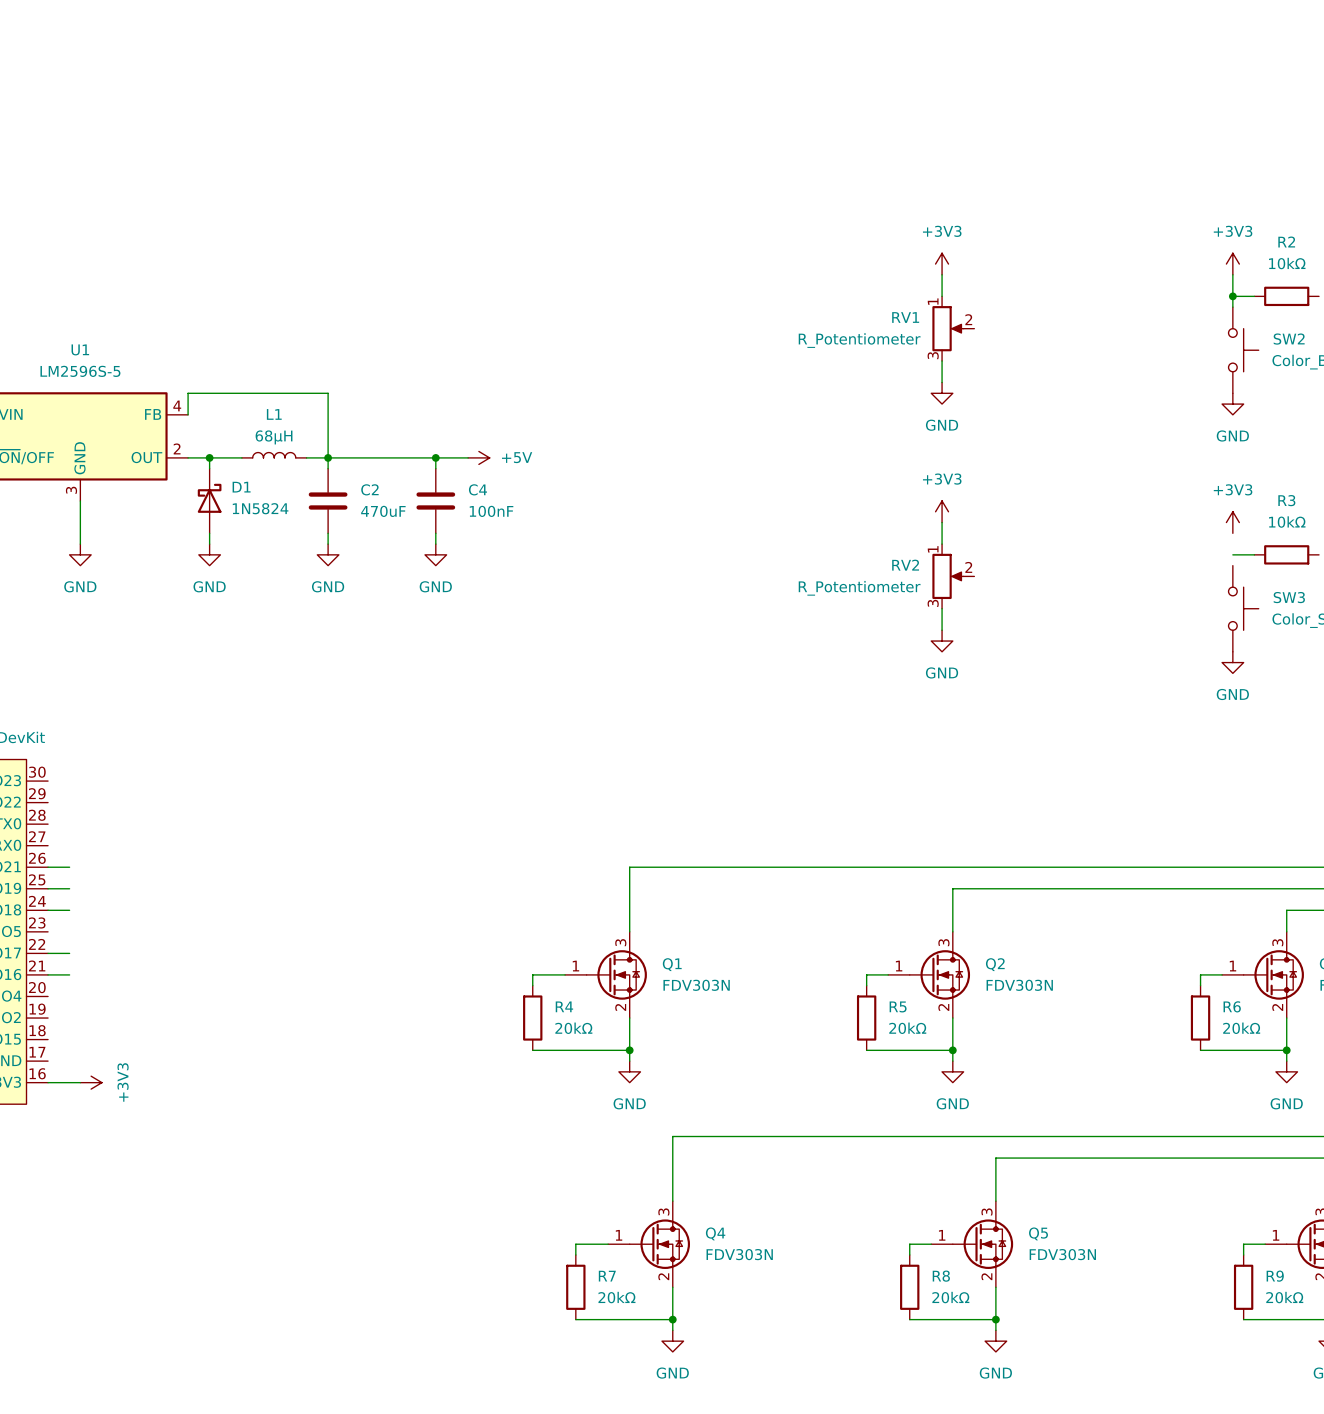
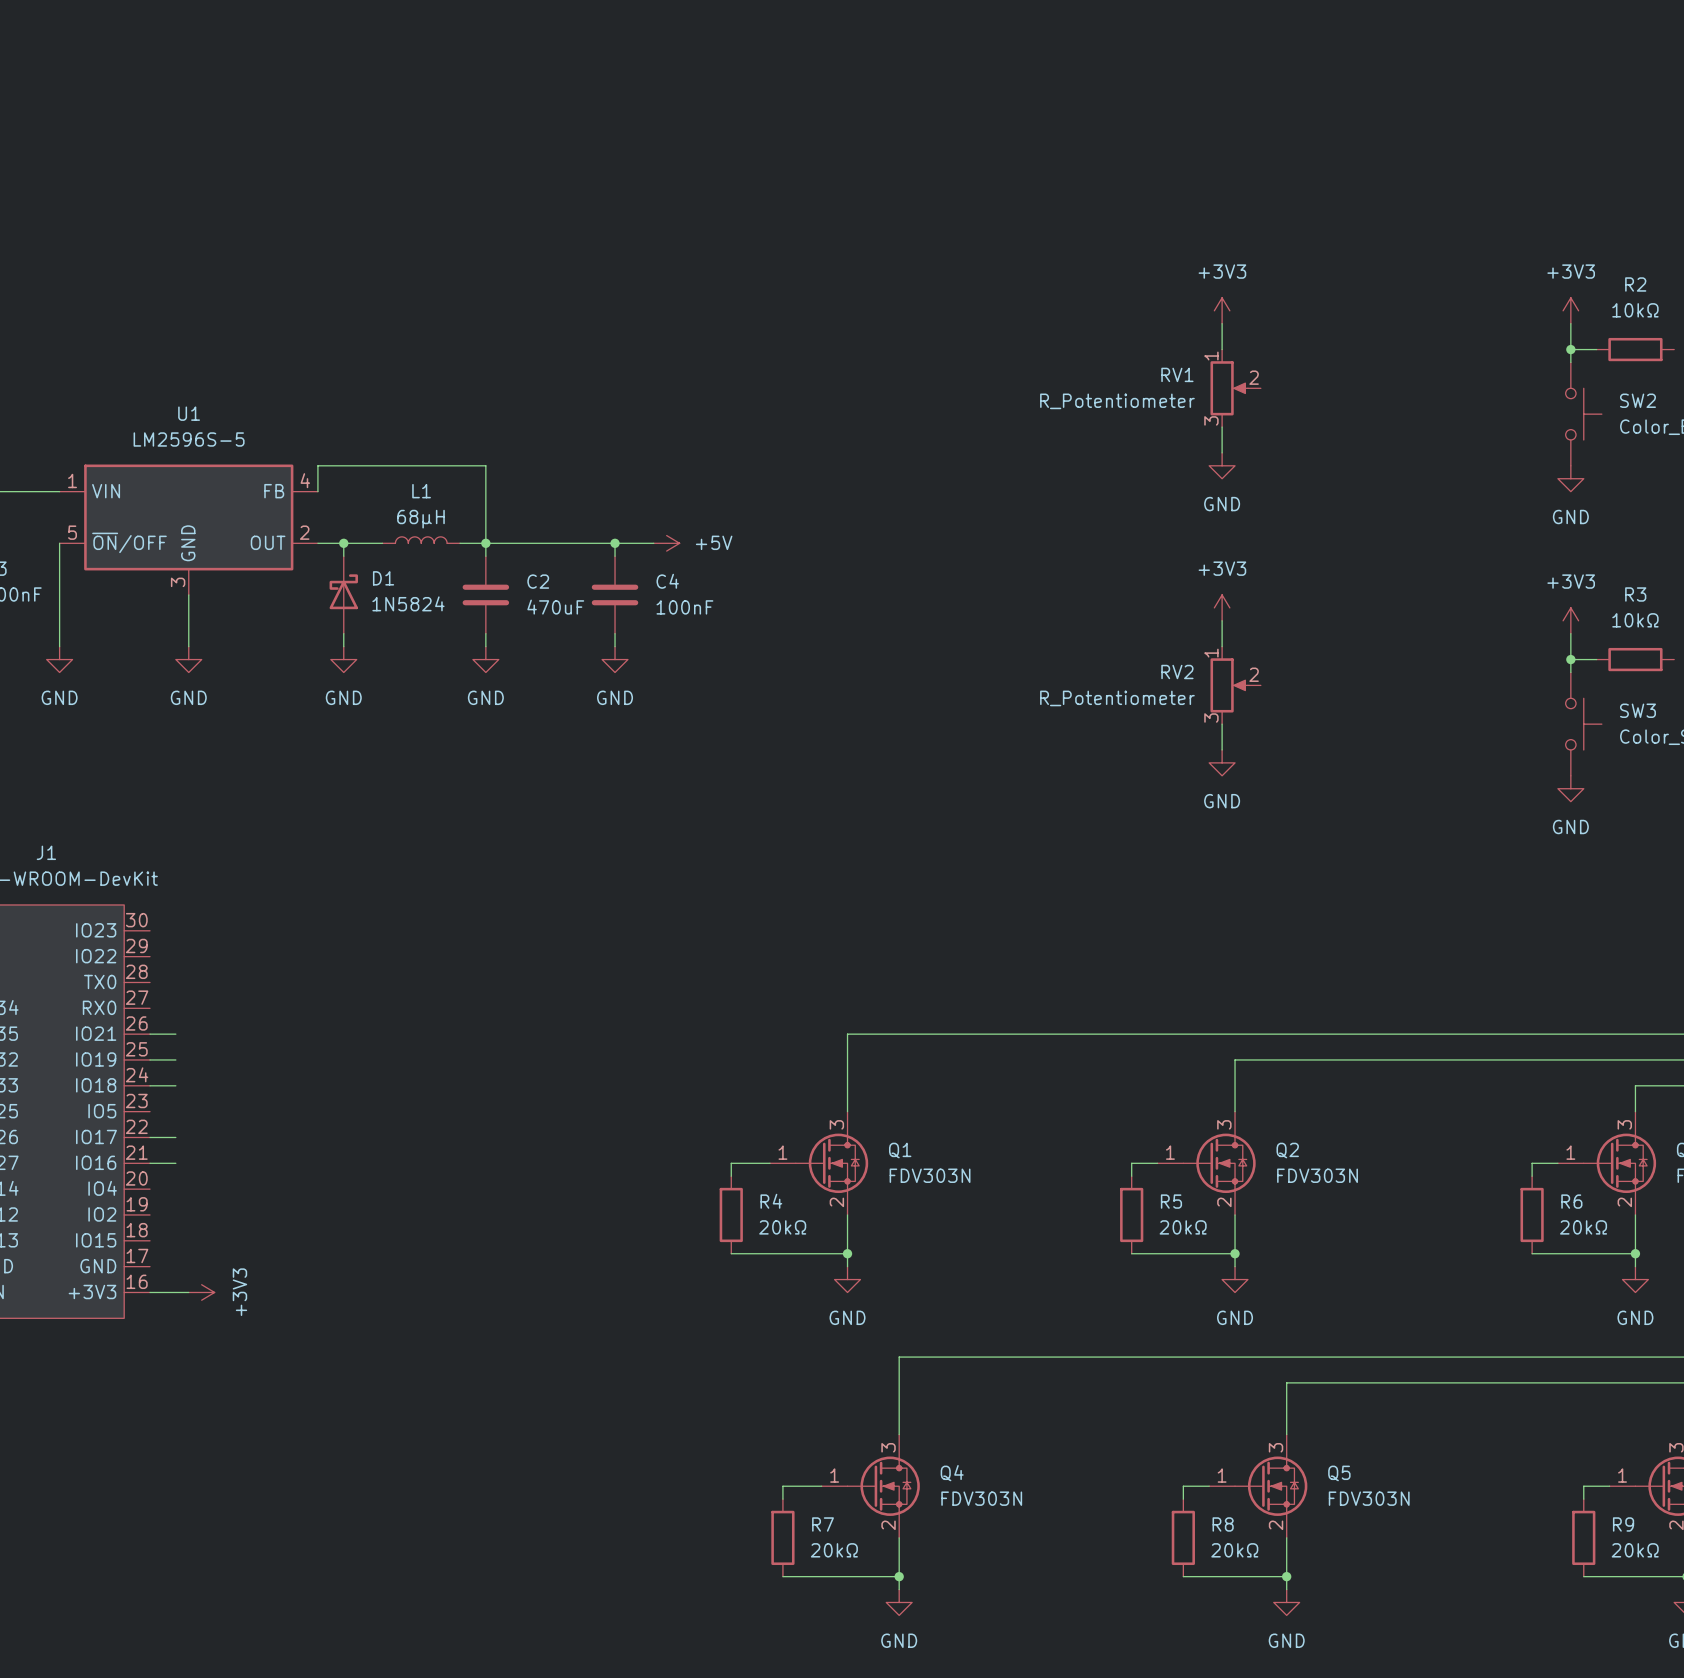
wire: none -> (1570, 633) (1570, 672)
junction: none -> (1570, 659)

